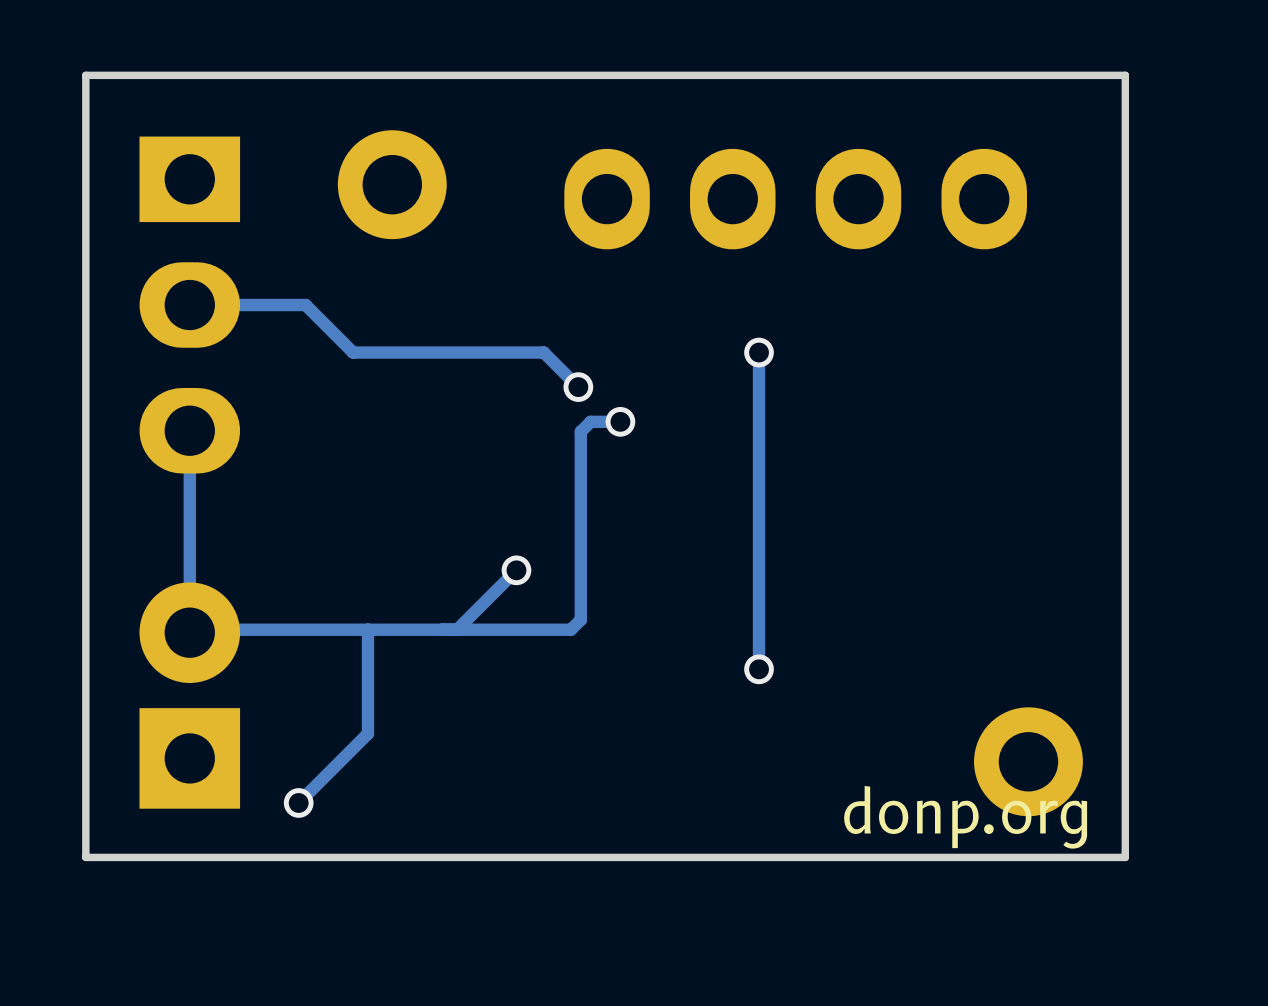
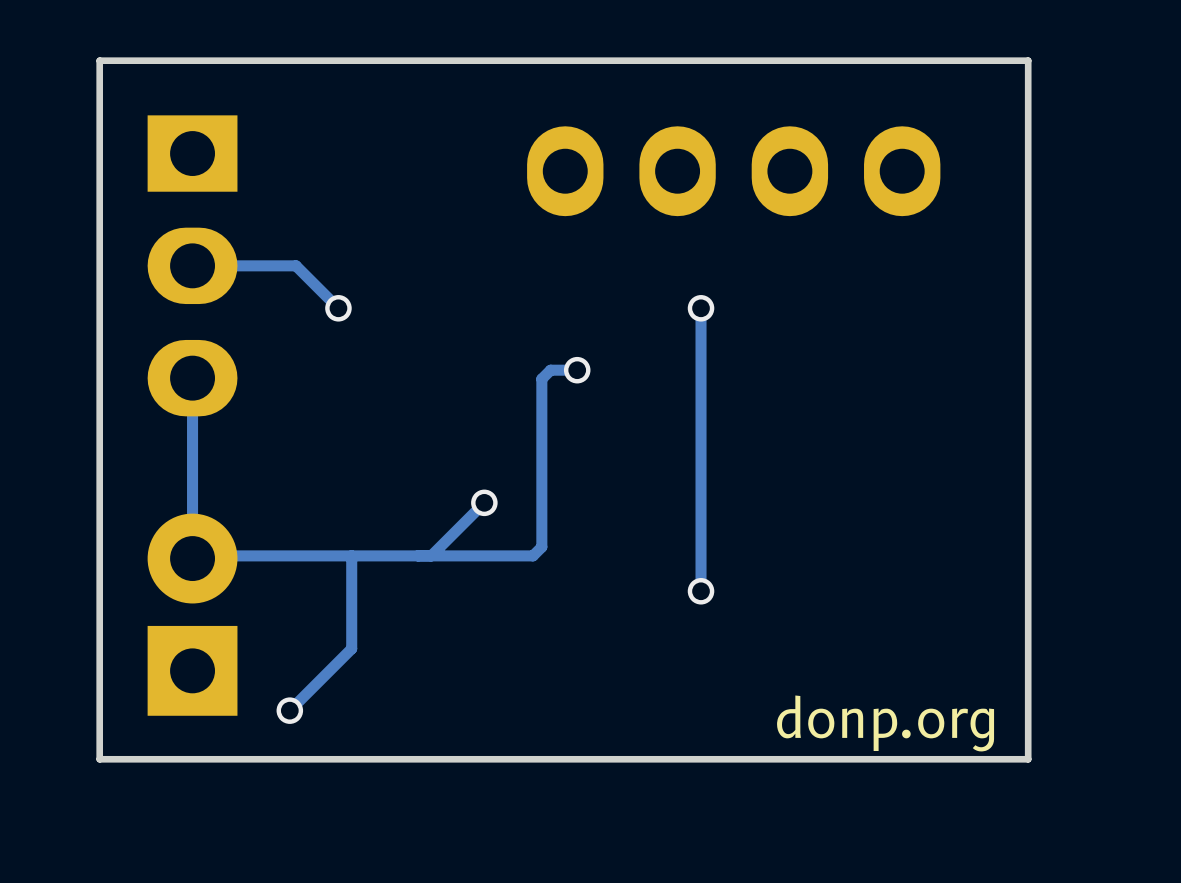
part: (392, 184) -> none
track: (353, 352) (543, 352) (578, 387) -> none
via position: (578, 387) -> (338, 308)
part: (1028, 761) -> none

